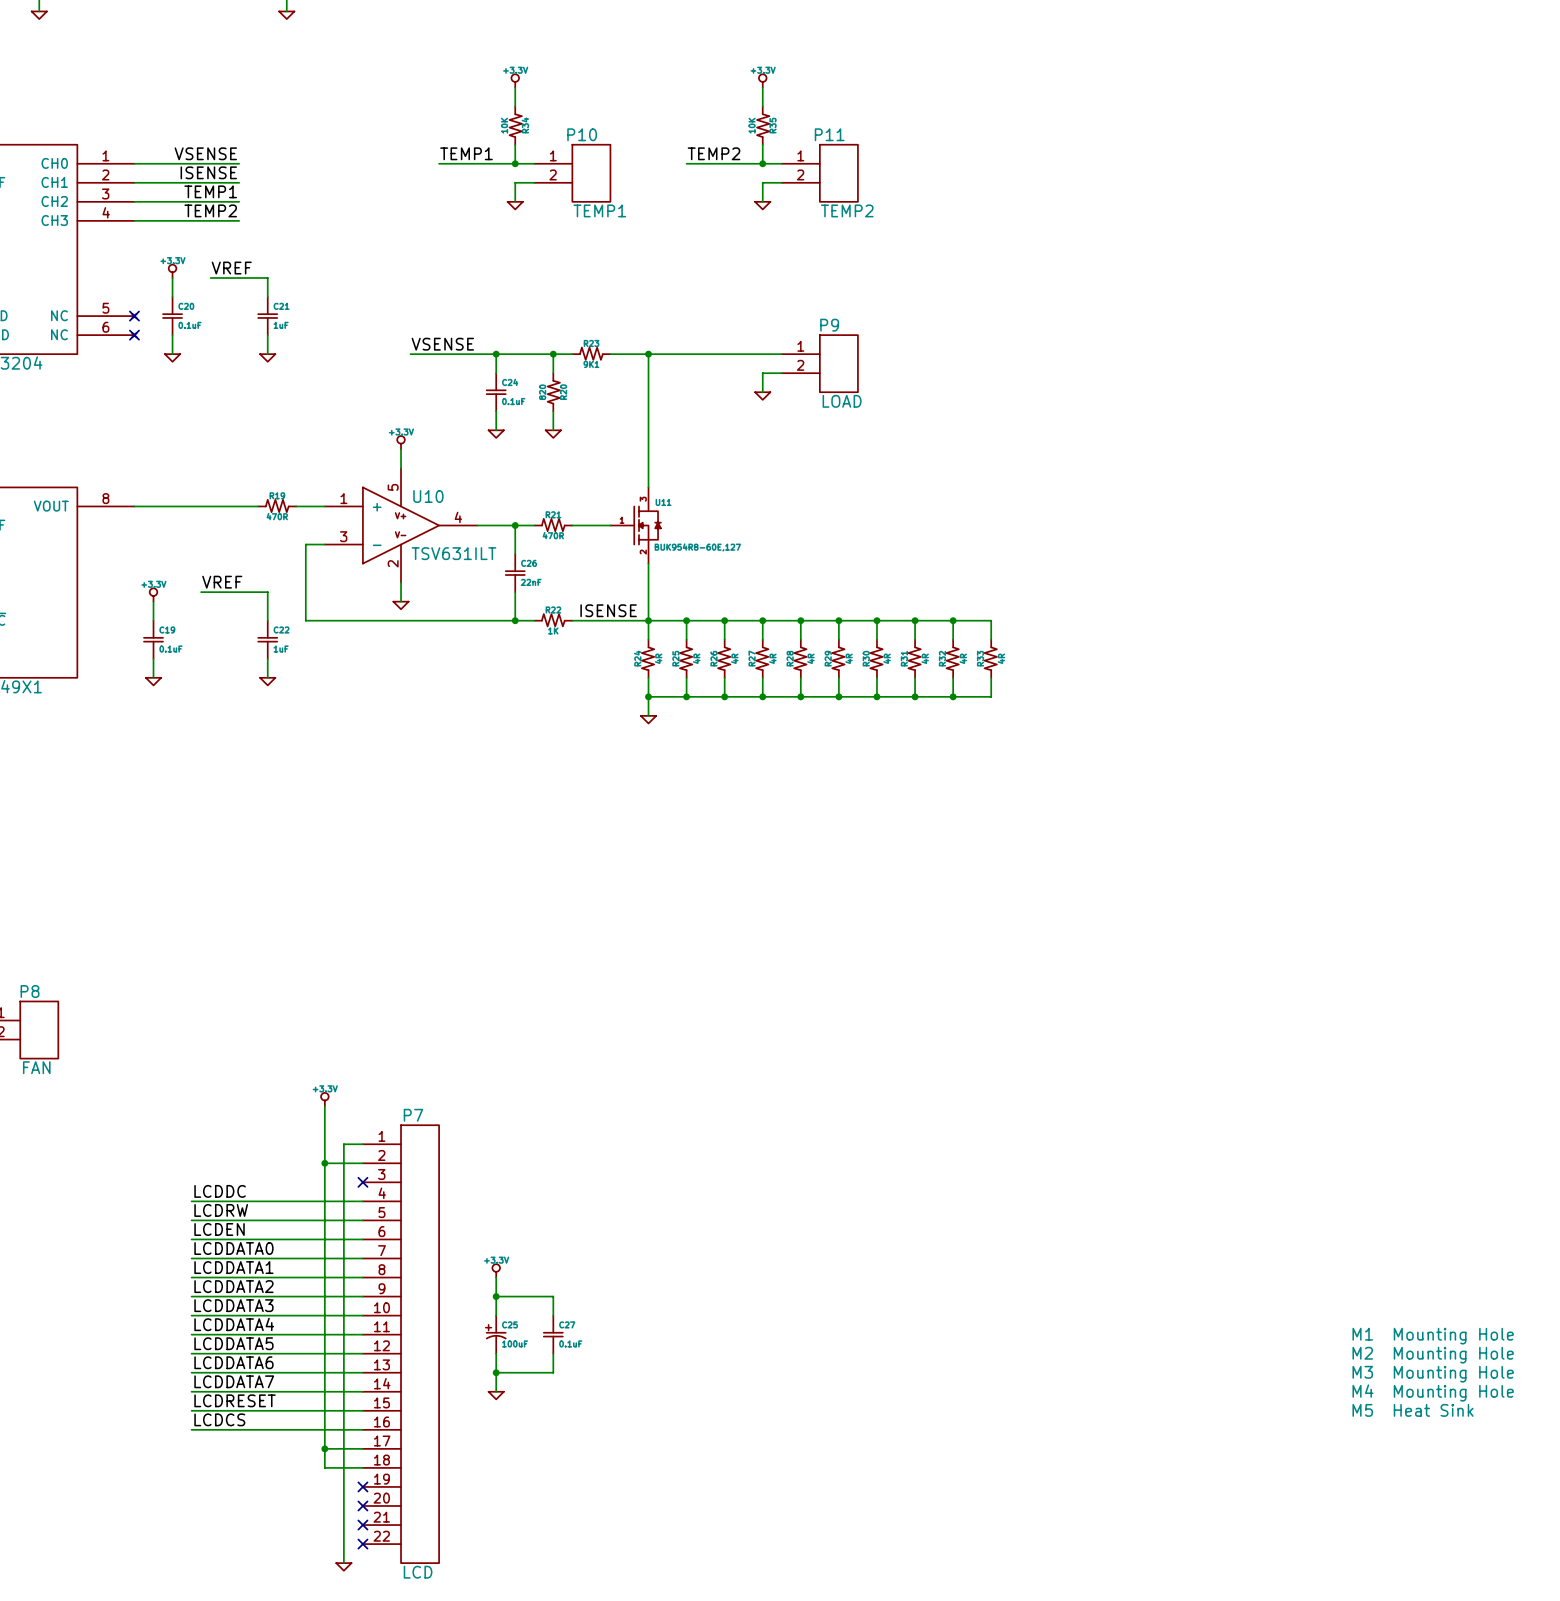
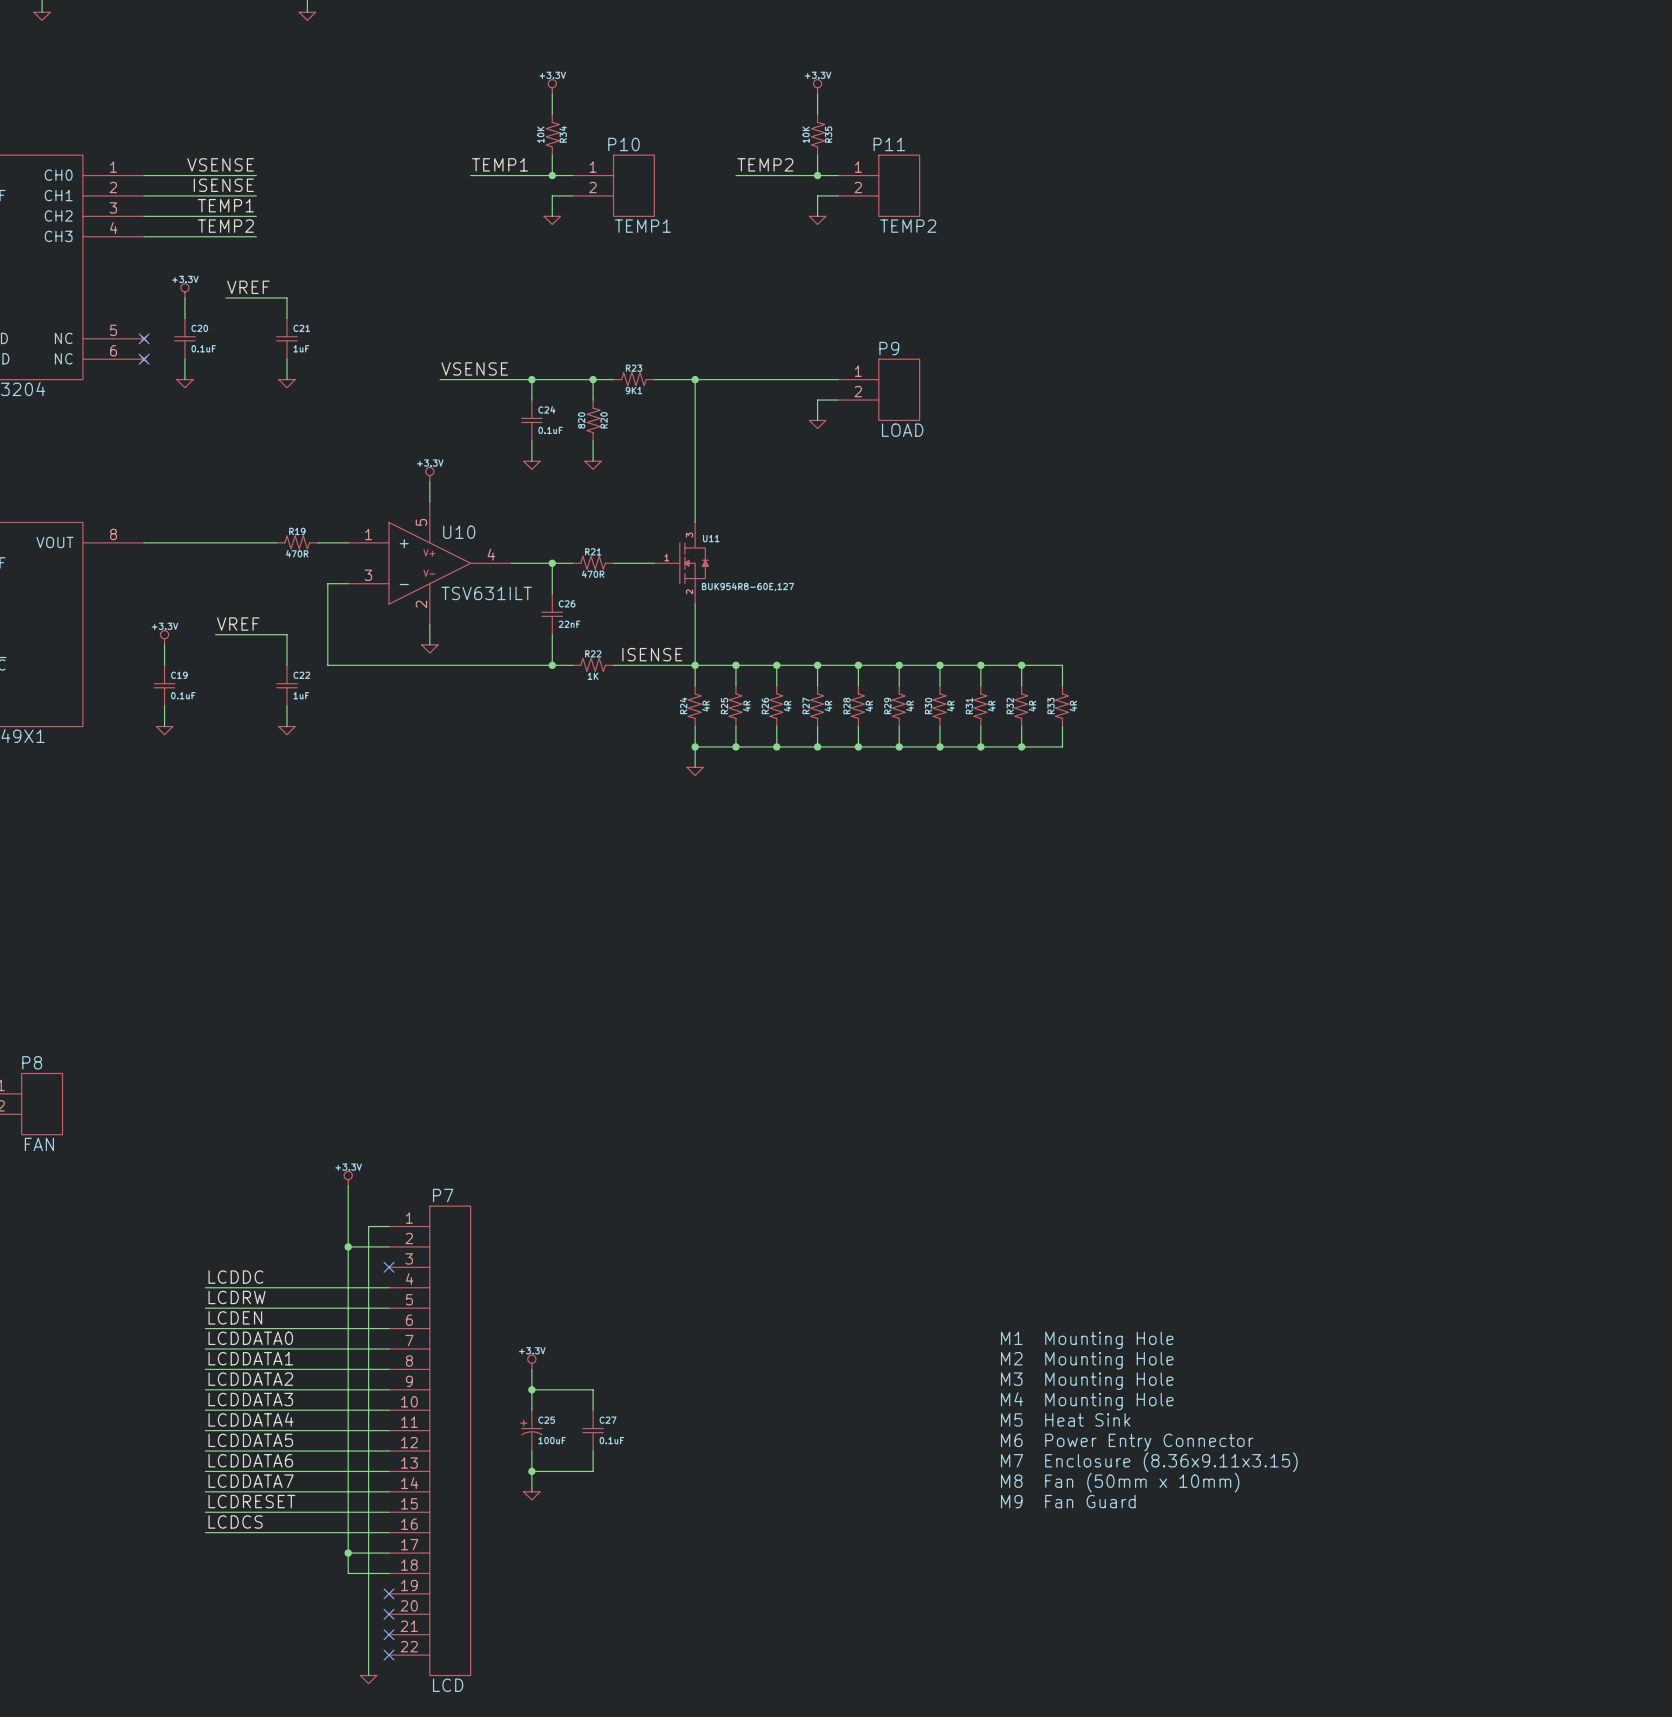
M1 position: (1433, 1336) -> (1087, 1340)
M6: none -> Power Entry Connector (1127, 1442)
M2 position: (1433, 1355) -> (1087, 1360)
M7: none -> Enclosure (8.36x9.11x3.15) (1149, 1462)
M3 position: (1433, 1374) -> (1087, 1381)
M8: none -> Fan (50mm x 10mm) (1120, 1482)
M4 position: (1433, 1392) -> (1087, 1401)
M9: none -> Fan Guard (1068, 1501)
M5 position: (1413, 1410) -> (1065, 1419)

